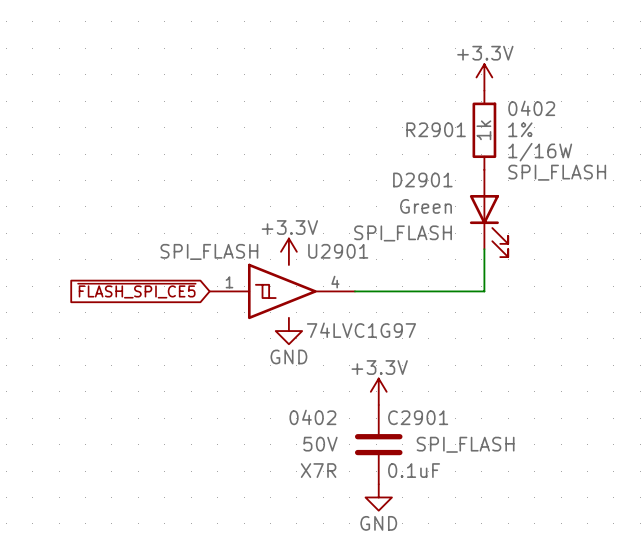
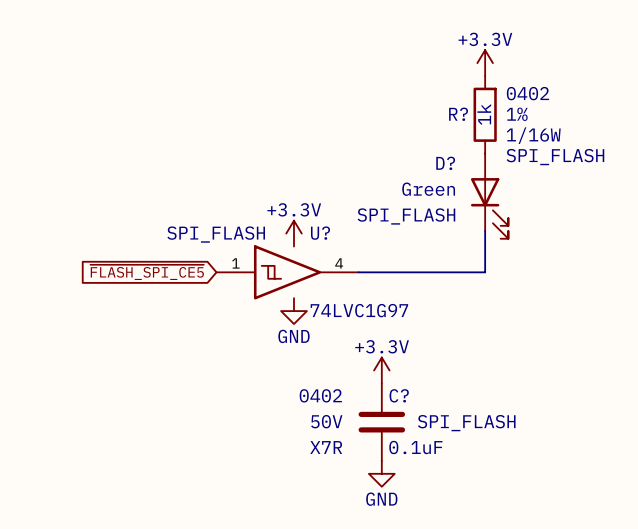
R2901 name: R2901 (436, 129) -> R? (458, 114)
D2901 name: D2901 (422, 179) -> D? (445, 163)
U2901 name: U2901 (338, 251) -> U? (320, 233)
C2901 name: C2901 (418, 417) -> C? (399, 395)

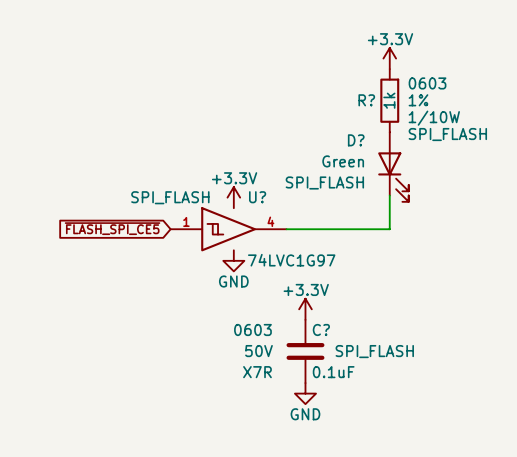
R? text: 0402 (527, 93) -> 0603 (427, 83)
R? text: 1/16W (533, 135) -> 1/10W (434, 118)
C? text: 0402 (320, 395) -> 0603 (252, 329)

